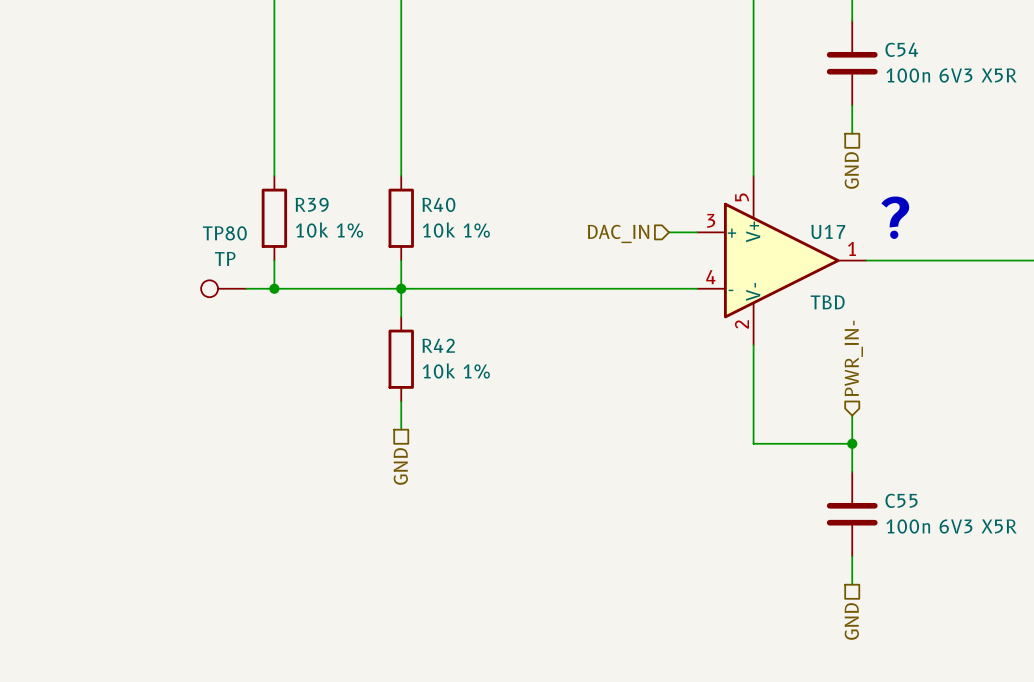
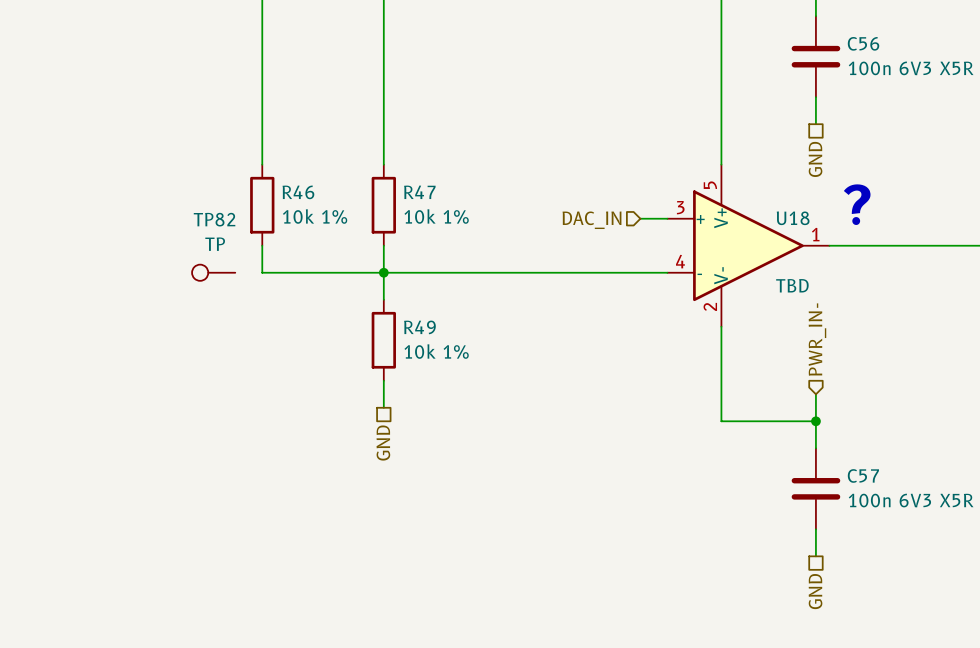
C54 name: C54 (901, 49) -> C56 (863, 43)
R39 name: R39 (312, 204) -> R46 (298, 192)
R40 name: R40 (438, 204) -> R47 (419, 192)
U17 name: U17 (828, 231) -> U18 (793, 218)
TP80 name: TP80 (224, 233) -> TP82 (214, 219)
wire: (246, 288) (274, 288) -> none
junction: (274, 288) -> none
R42 name: R42 (438, 345) -> R49 (419, 327)
C55 name: C55 (901, 500) -> C57 (863, 475)

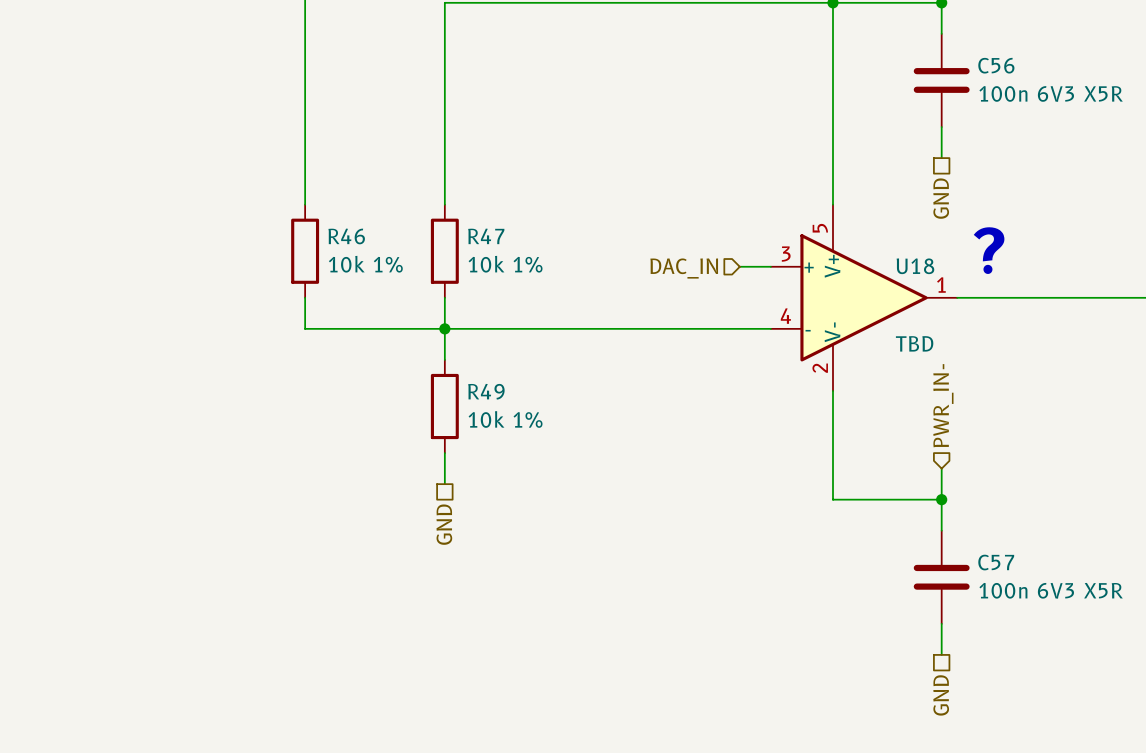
TP82: TP (213, 272) -> none

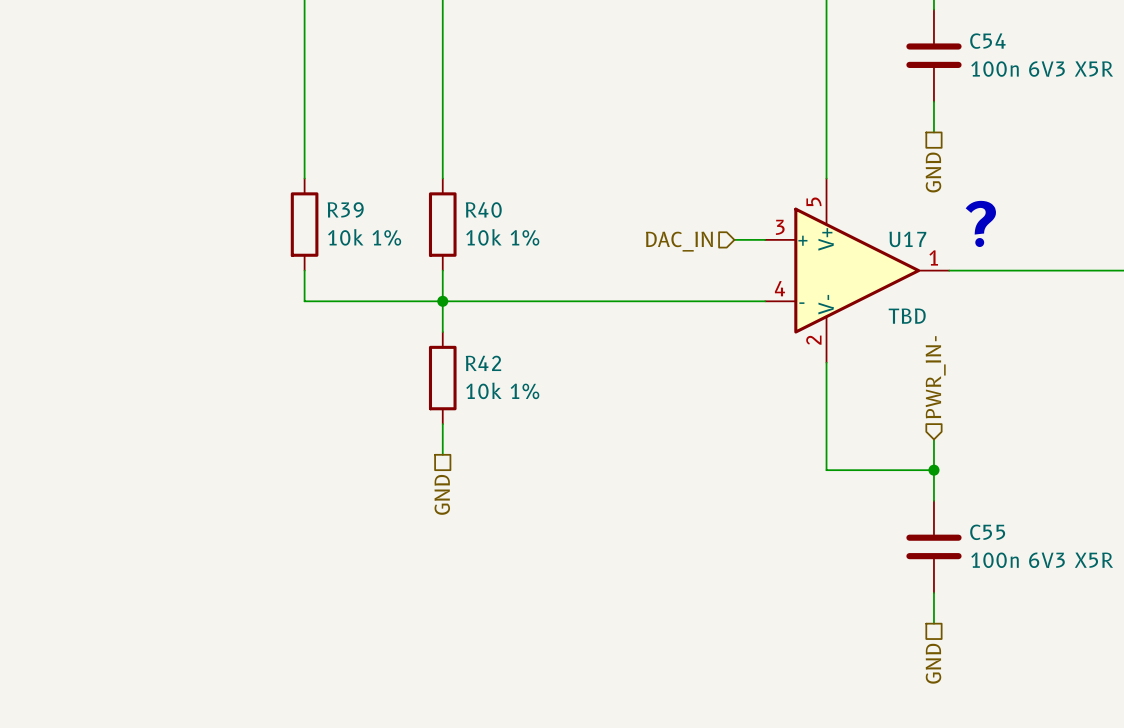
C56 name: C56 (996, 65) -> C54 (987, 41)
R46 name: R46 (346, 236) -> R39 (345, 209)
R47 name: R47 (486, 236) -> R40 (483, 209)
U18 name: U18 (915, 266) -> U17 (907, 239)
R49 name: R49 (486, 391) -> R42 (483, 363)
C57 name: C57 (996, 562) -> C55 (987, 532)

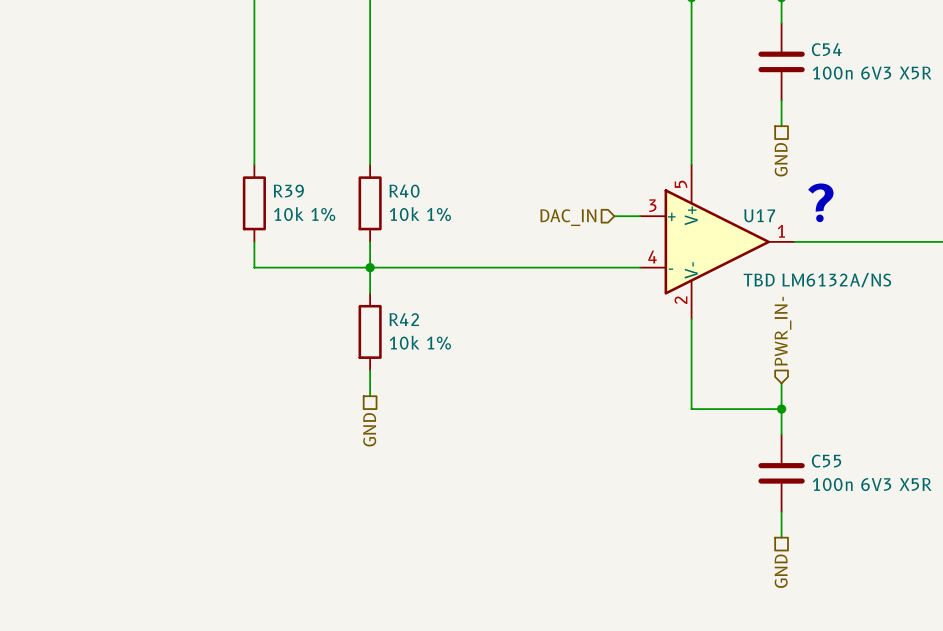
U17 value: TBD (907, 316) -> TBD LM6132A/NS (817, 280)

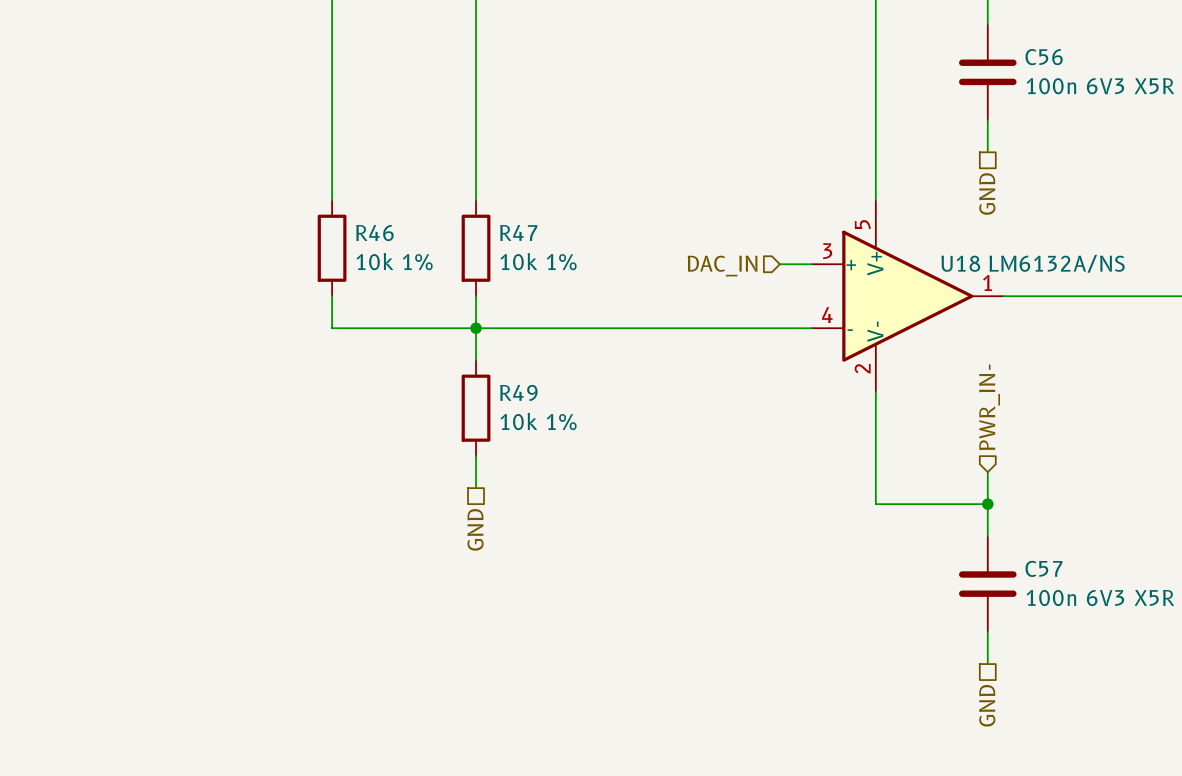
C54 name: C54 (826, 49) -> C56 (1044, 57)
R39 name: R39 (288, 191) -> R46 (374, 233)
R40 name: R40 (404, 191) -> R47 (518, 232)
text: ? (820, 202) -> none
U17 name: U17 (759, 215) -> U18 (960, 263)
U17 value: TBD LM6132A/NS (817, 280) -> LM6132A/NS (1057, 263)
R42 name: R42 (404, 319) -> R49 (518, 392)
C55 name: C55 (826, 461) -> C57 (1043, 568)

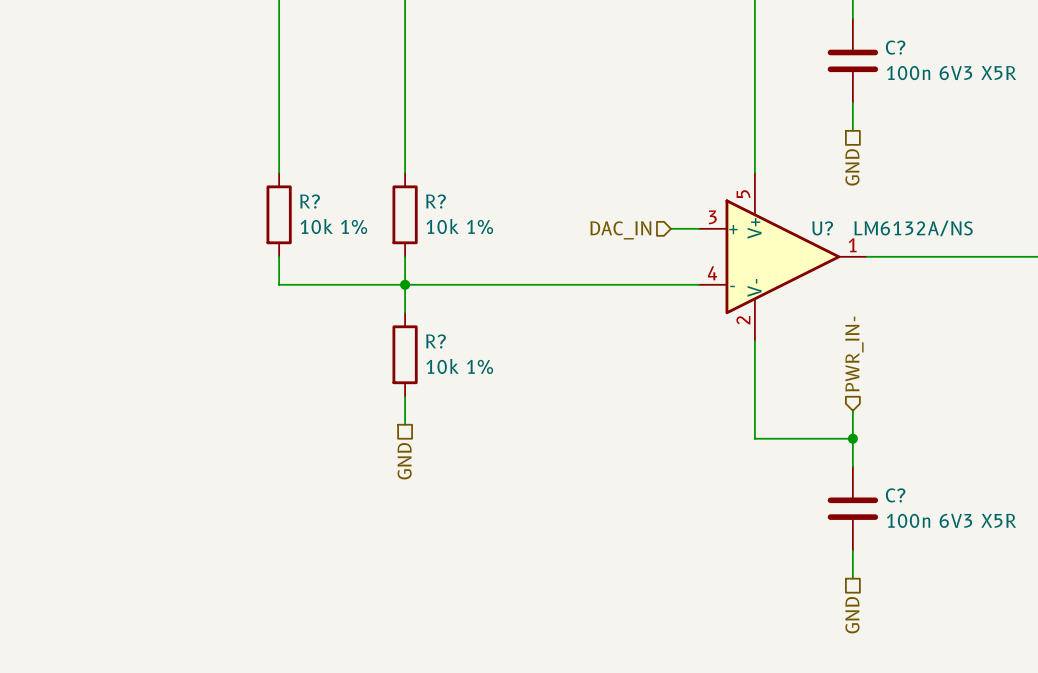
C56 name: C56 (1044, 57) -> C? (895, 47)
R47 name: R47 (518, 232) -> R? (435, 201)
R46 name: R46 (374, 233) -> R? (310, 201)
U18 name: U18 (960, 263) -> U? (822, 228)
R49 name: R49 (518, 392) -> R? (435, 341)
C57 name: C57 (1043, 568) -> C? (895, 495)

